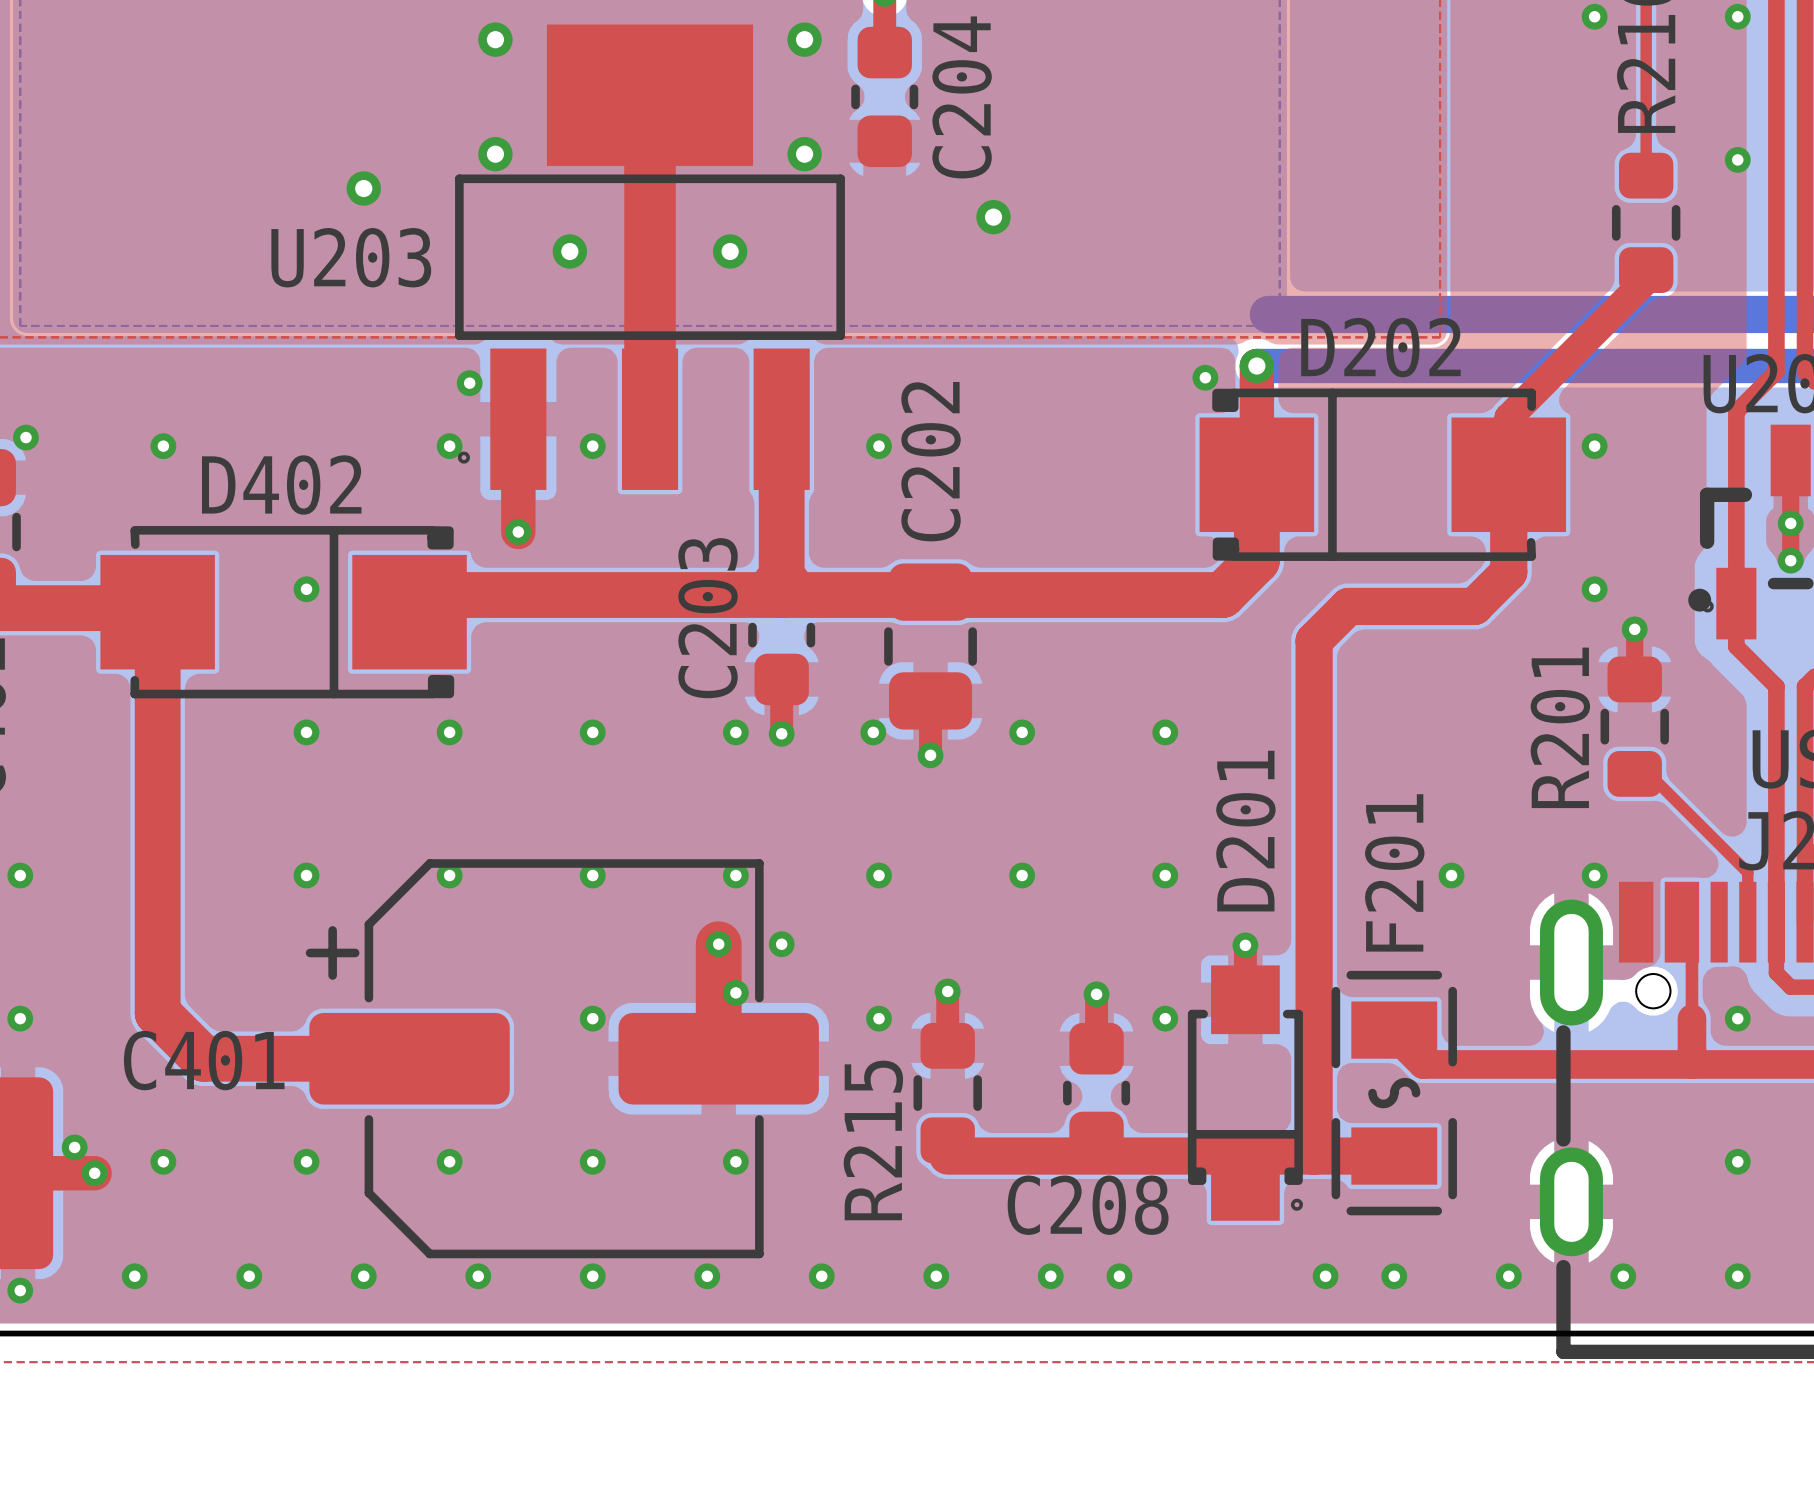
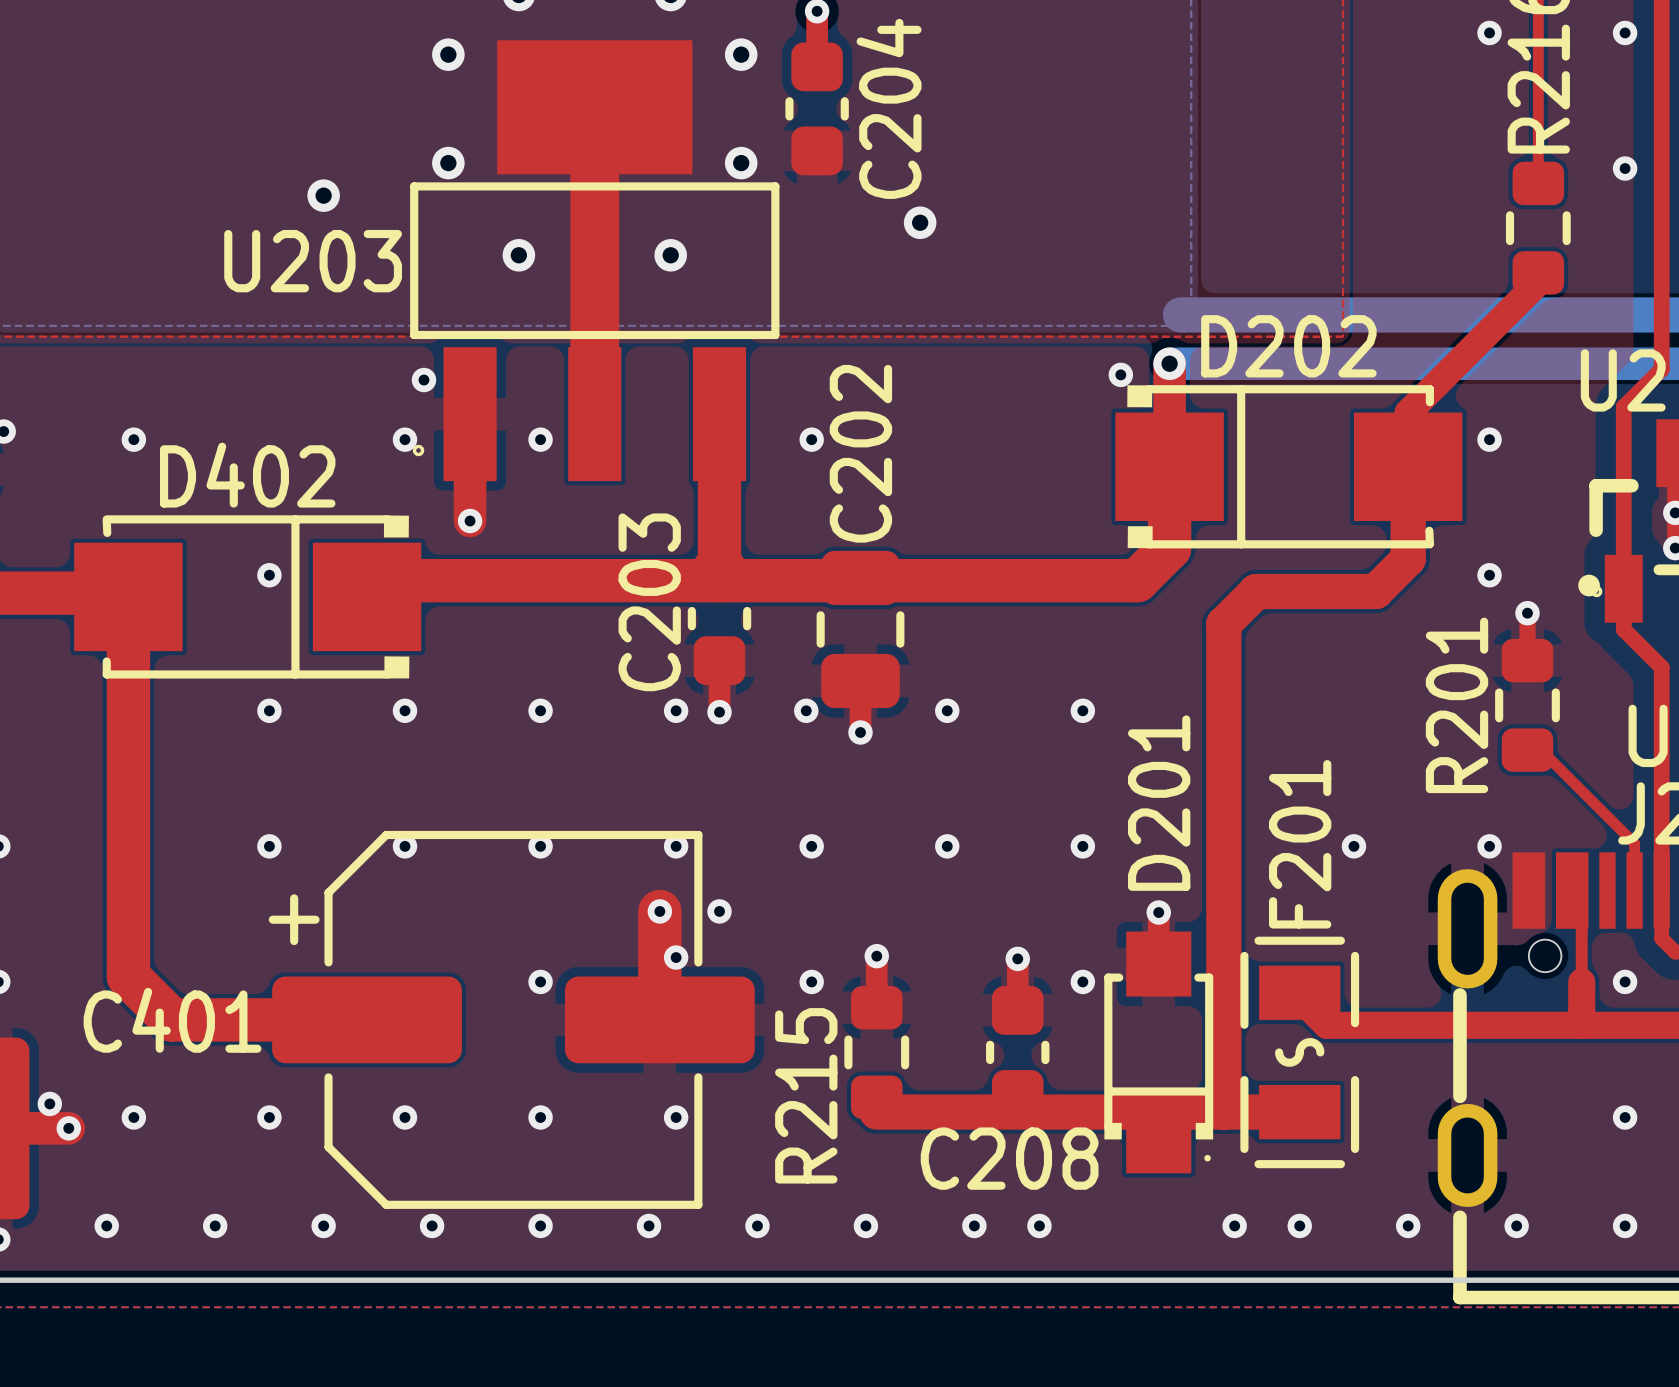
D202 footprint: [1199, 388, 1567, 561] -> [1115, 385, 1463, 549]
D402 footprint: [100, 526, 467, 699] -> [74, 515, 422, 679]
D201 footprint: [1187, 965, 1303, 1221] -> [1104, 931, 1214, 1174]

